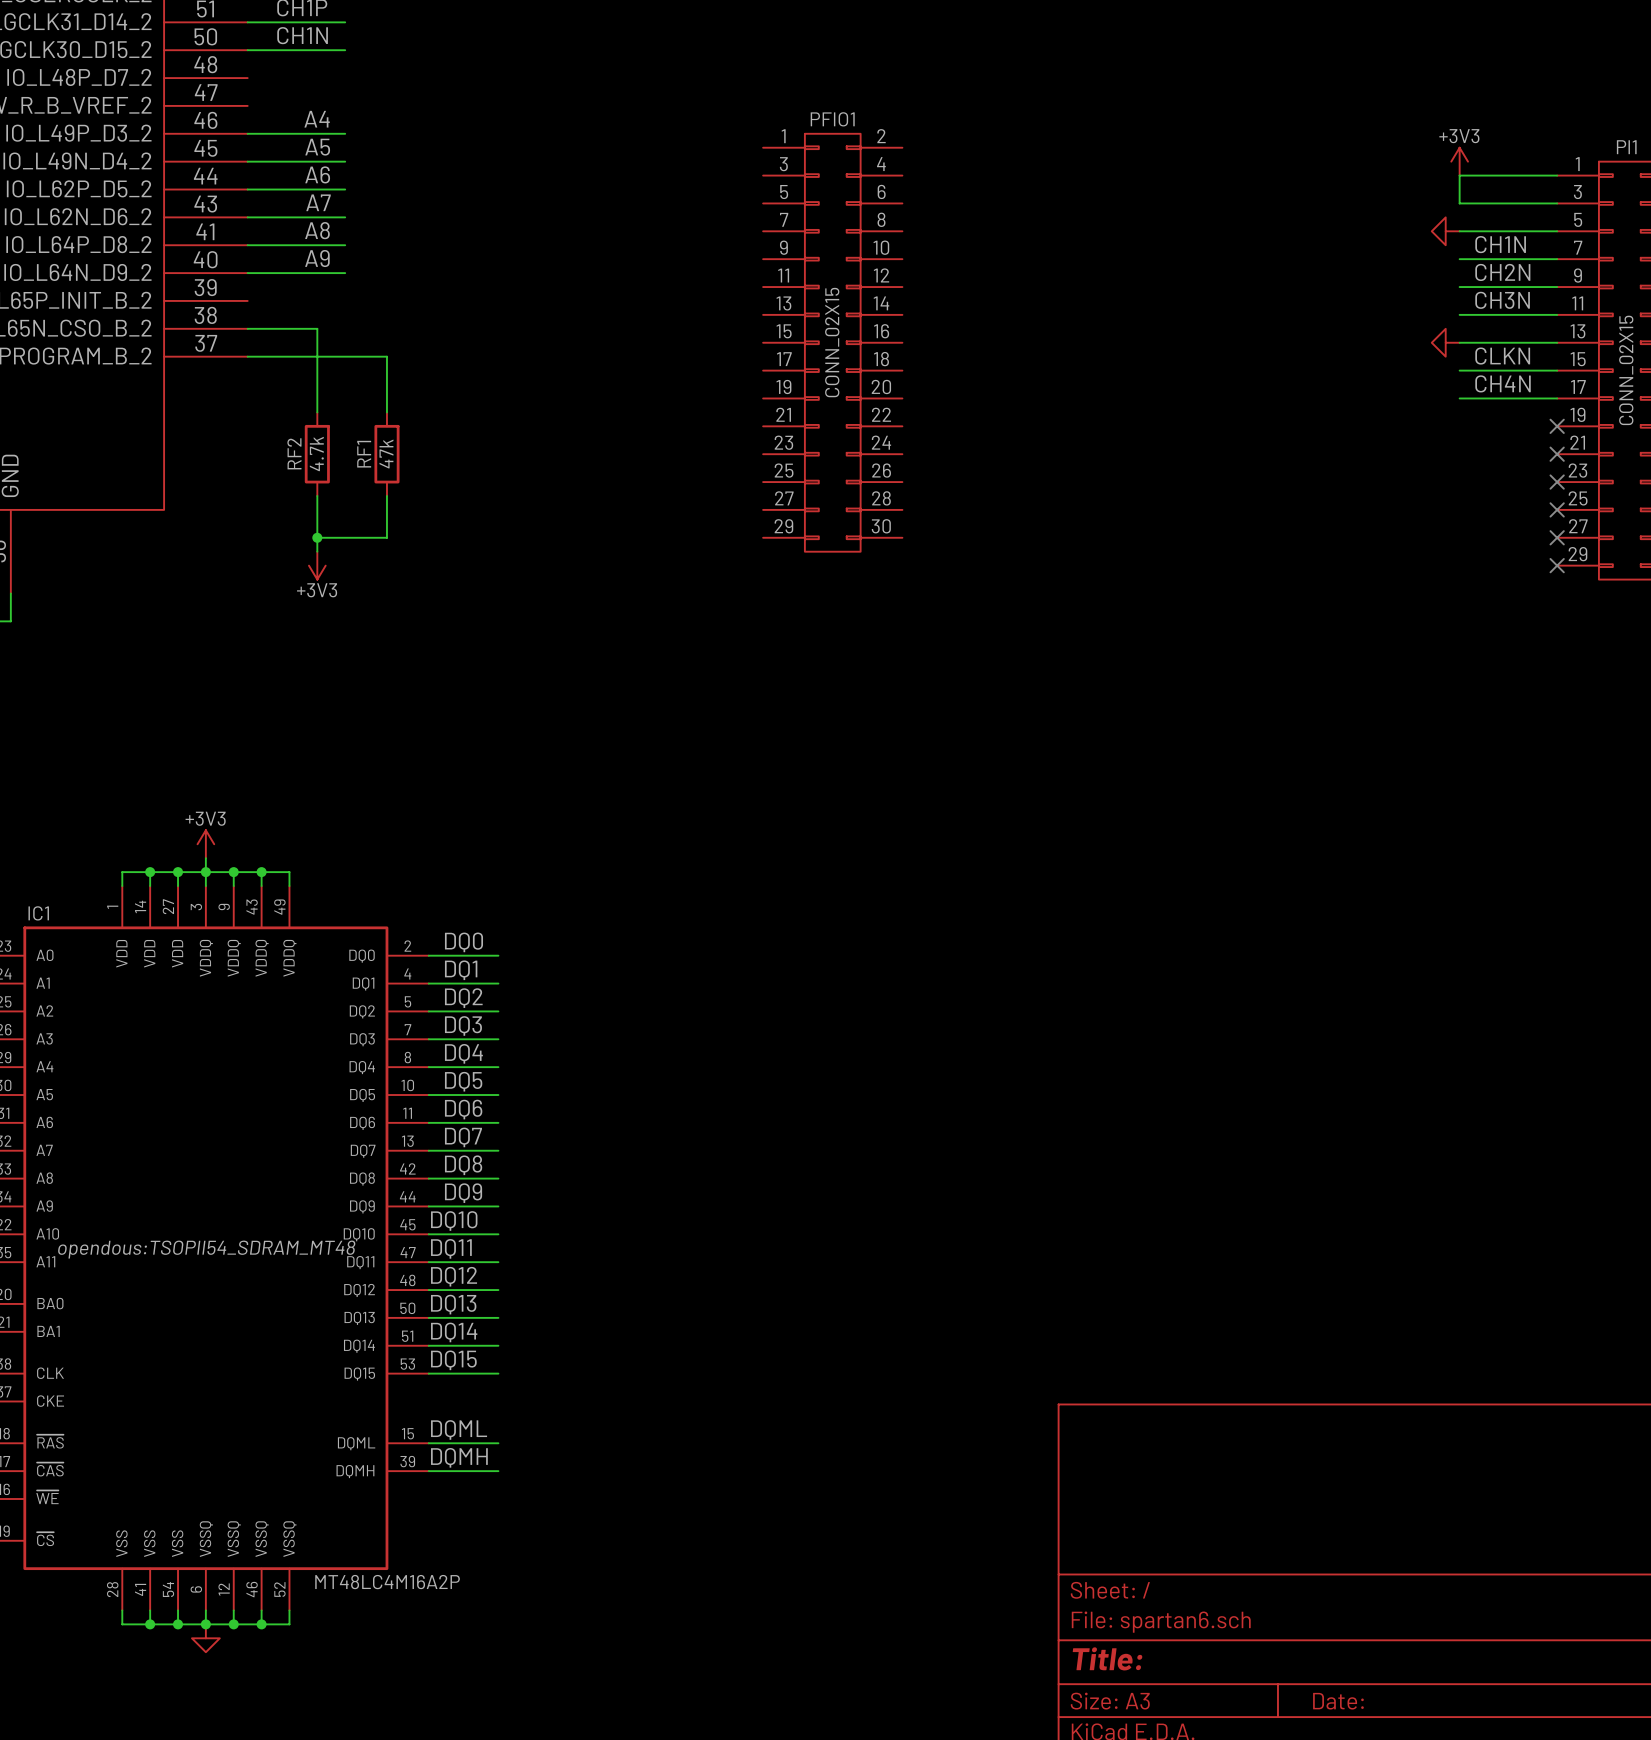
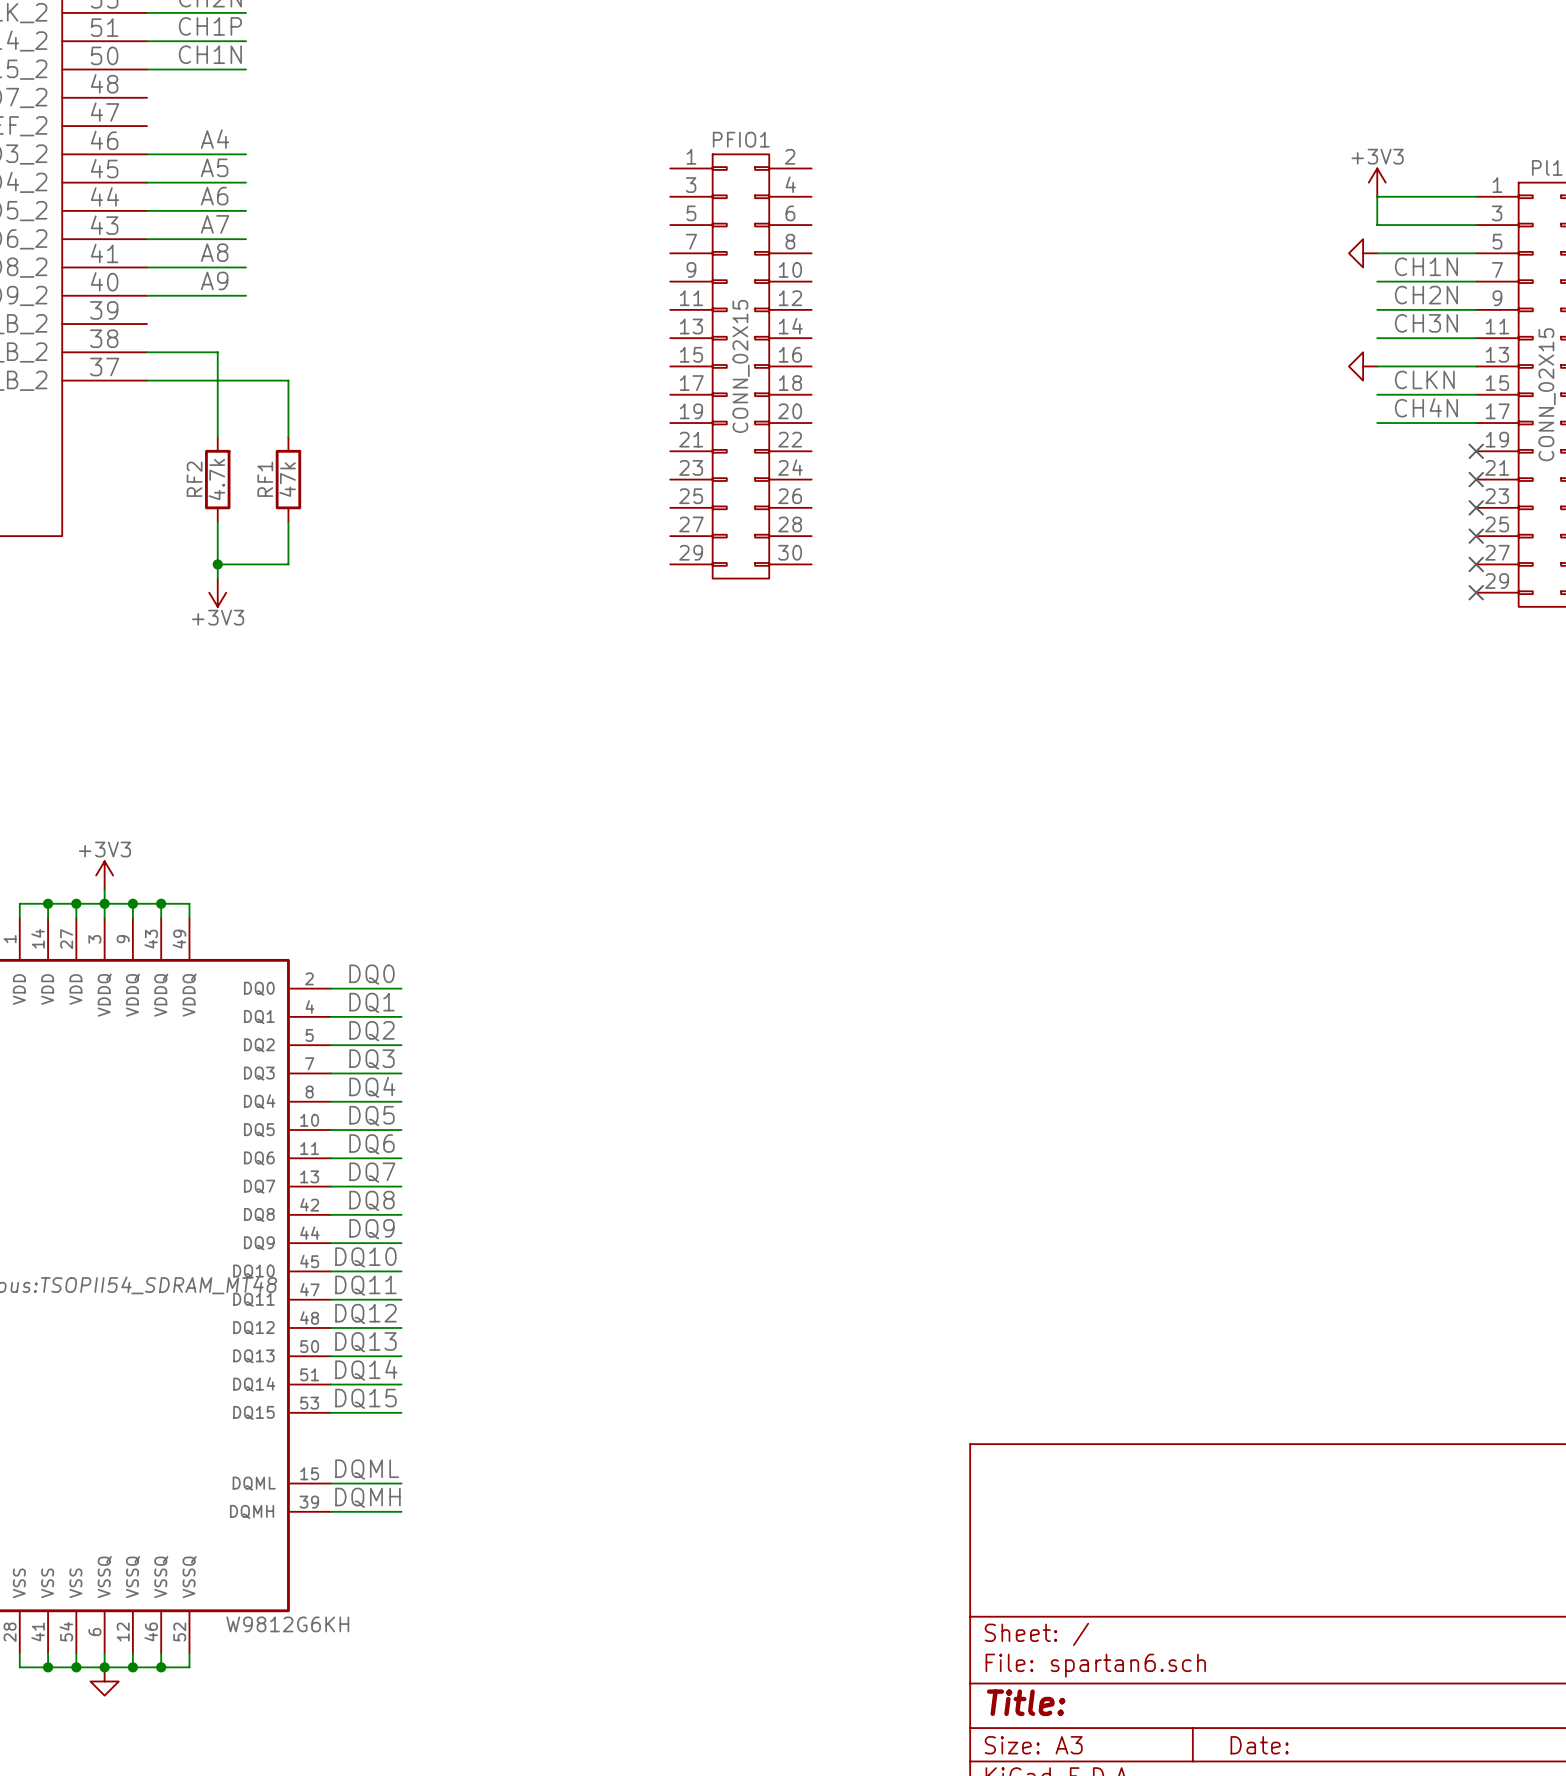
IC1 value: MT48LC4M16A2P (387, 1582) -> W9812G6KH (287, 1624)

